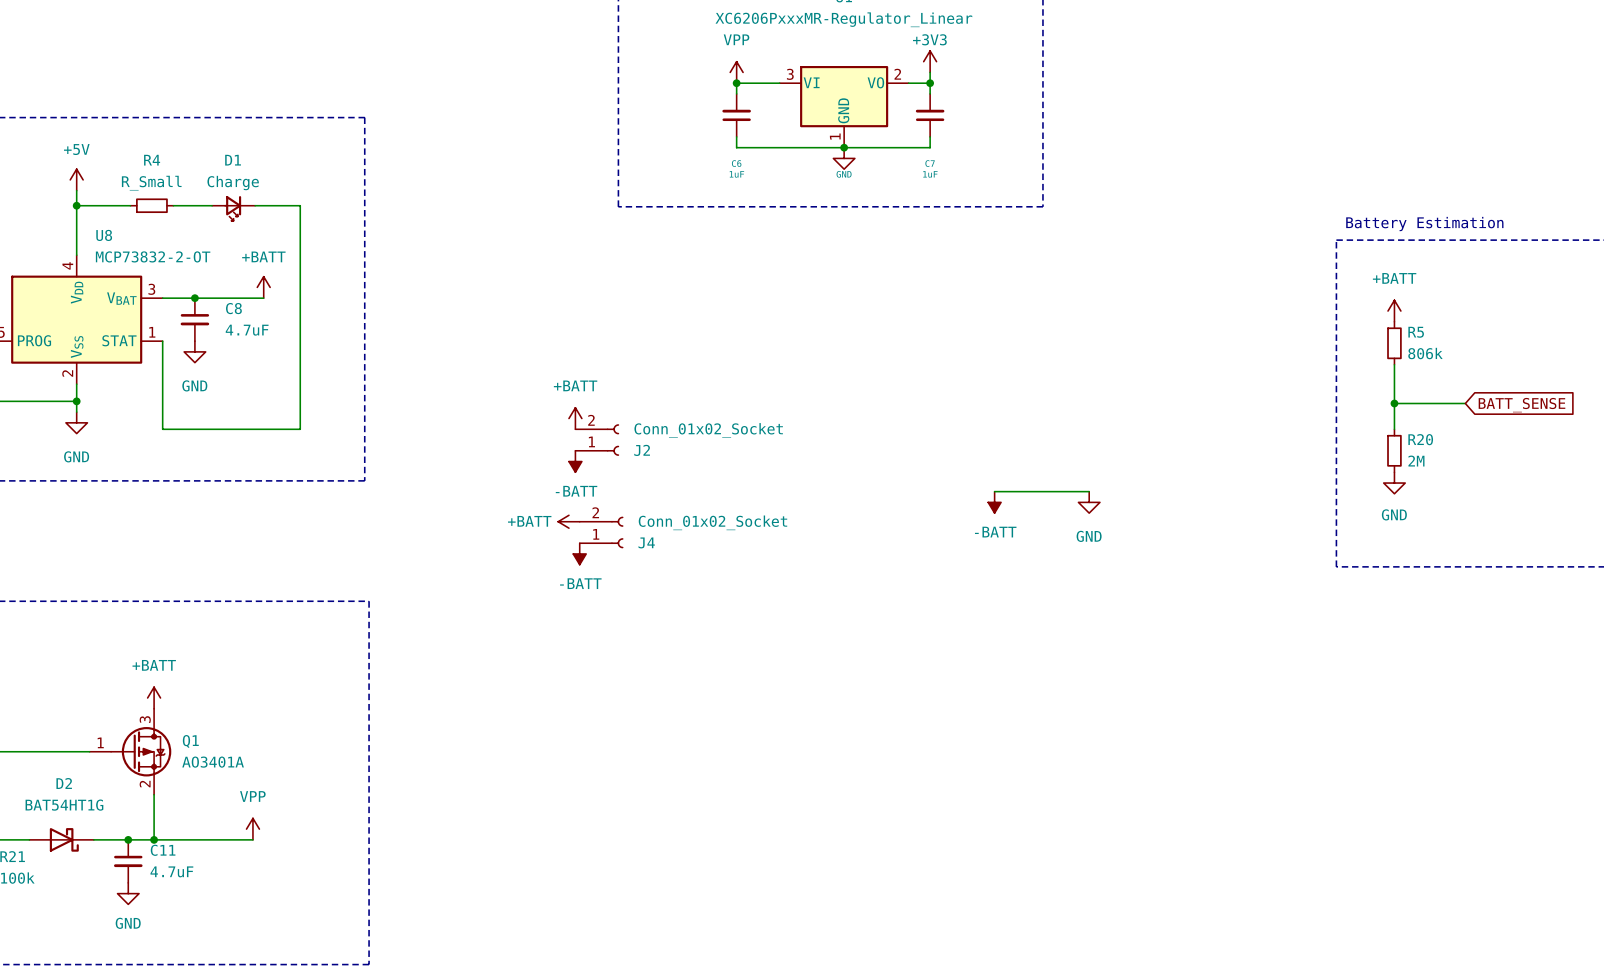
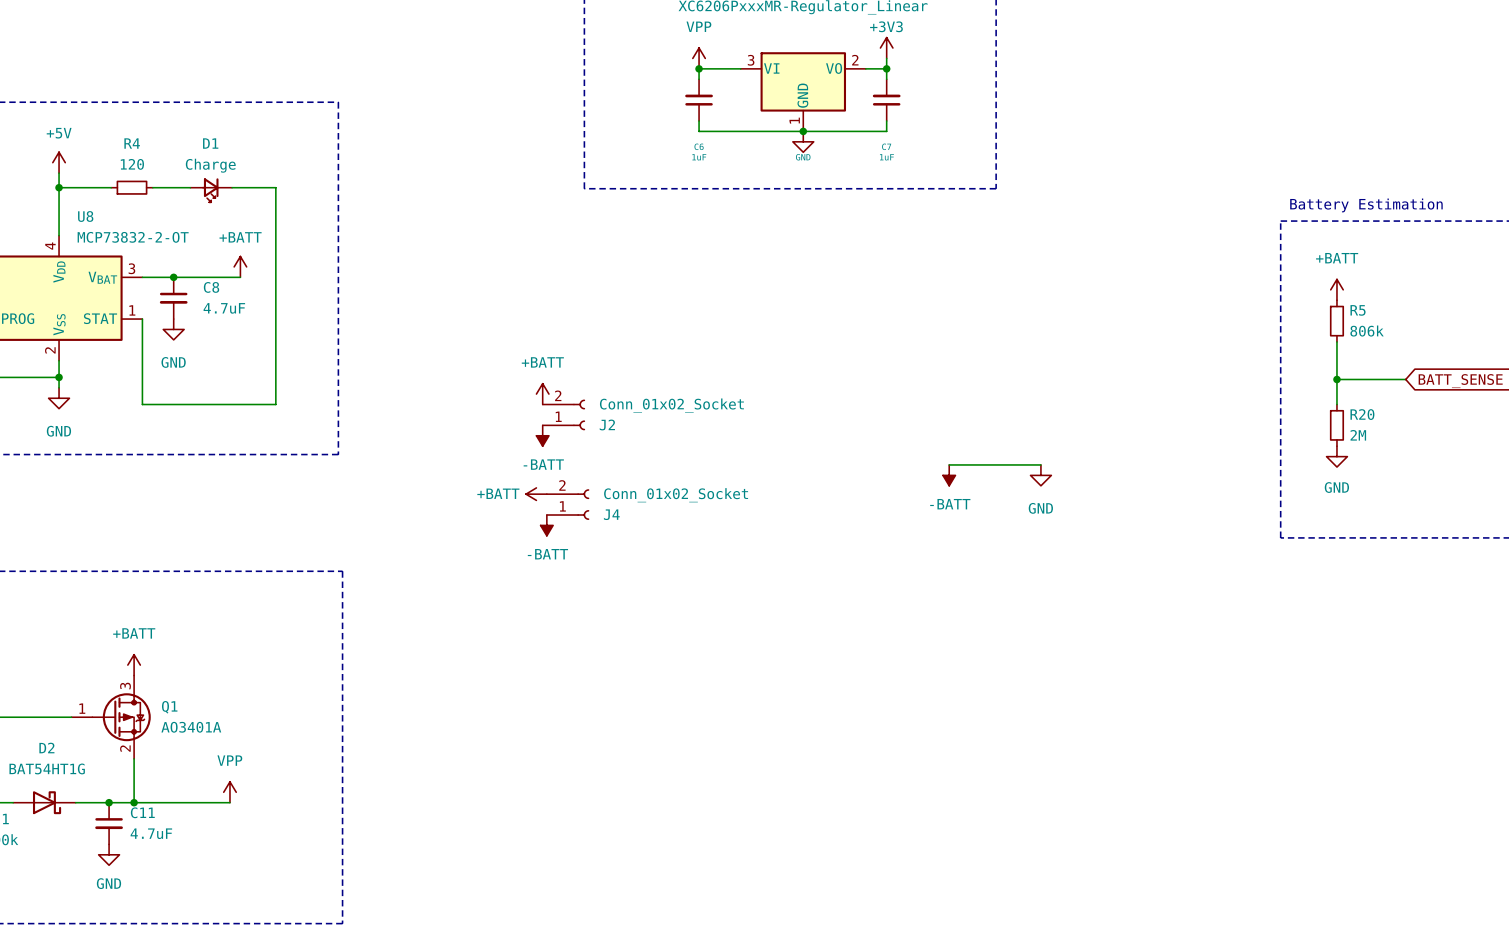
R4 value: R_Small (151, 183) -> 120 (132, 164)

